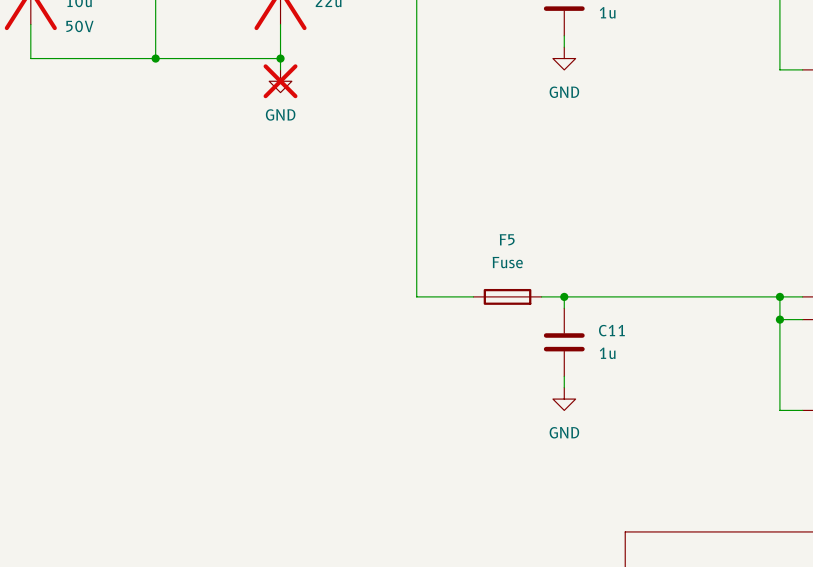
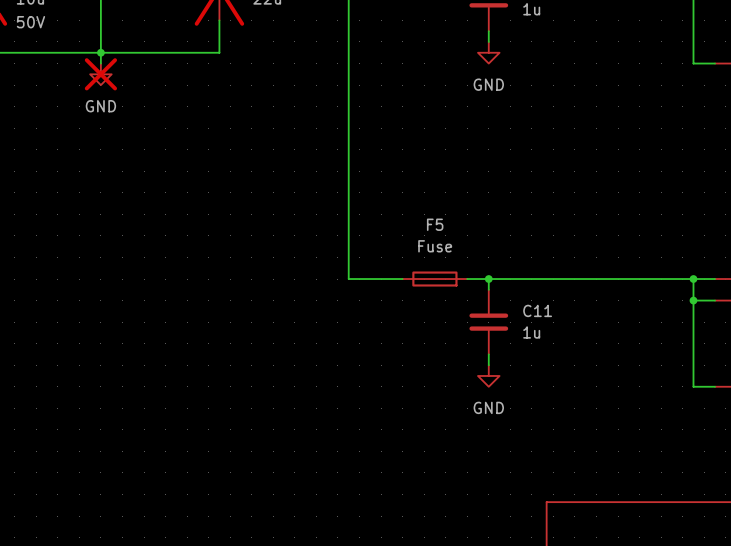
wire: (280, 58) (280, 69) -> (100, 52) (100, 63)
junction: (280, 58) -> none
power symbol position: GND (280, 81) -> GND (100, 74)

